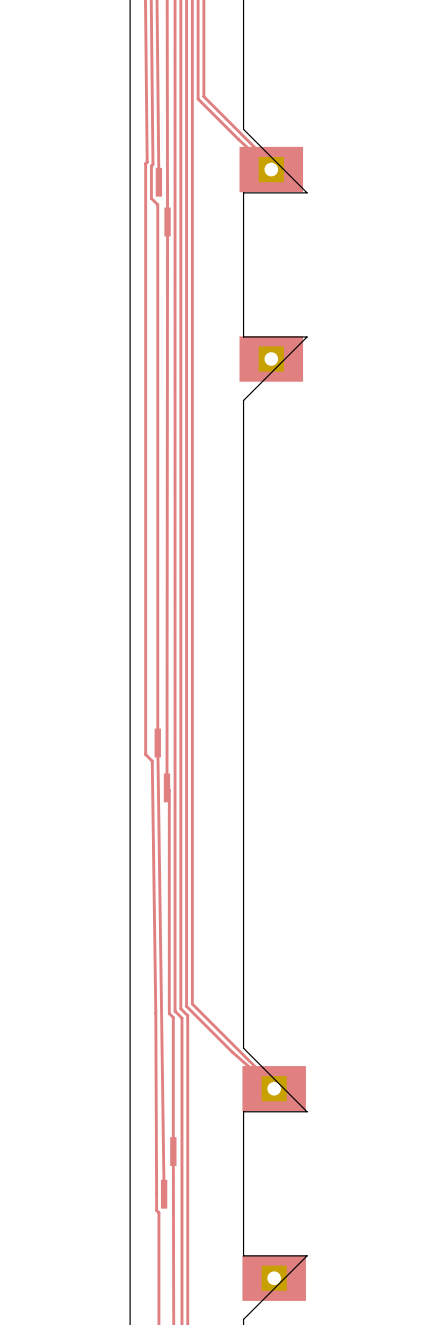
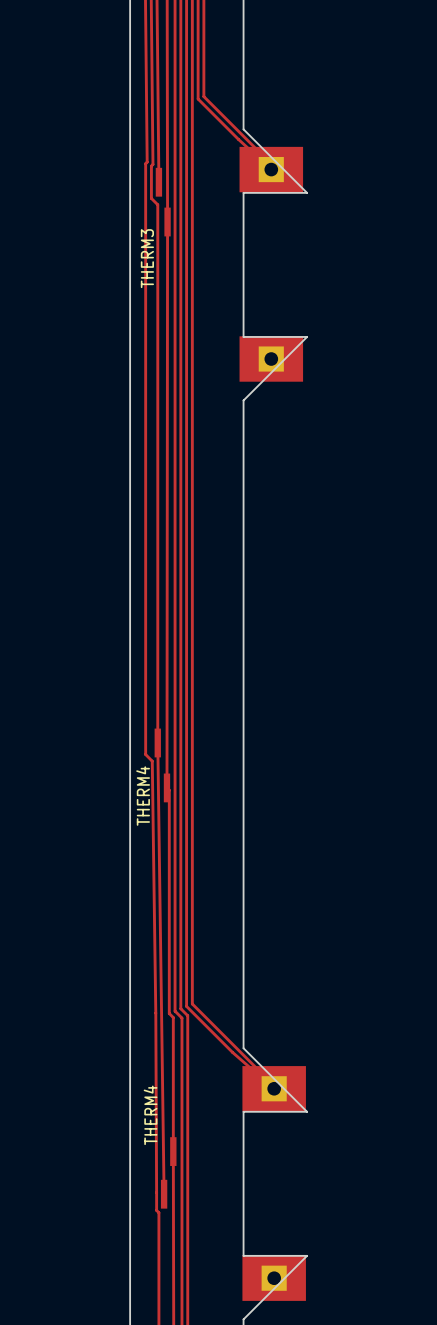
text: none -> THERM3 (147, 258)
text: none -> THERM4 (143, 796)
text: none -> THERM4 (150, 1115)

